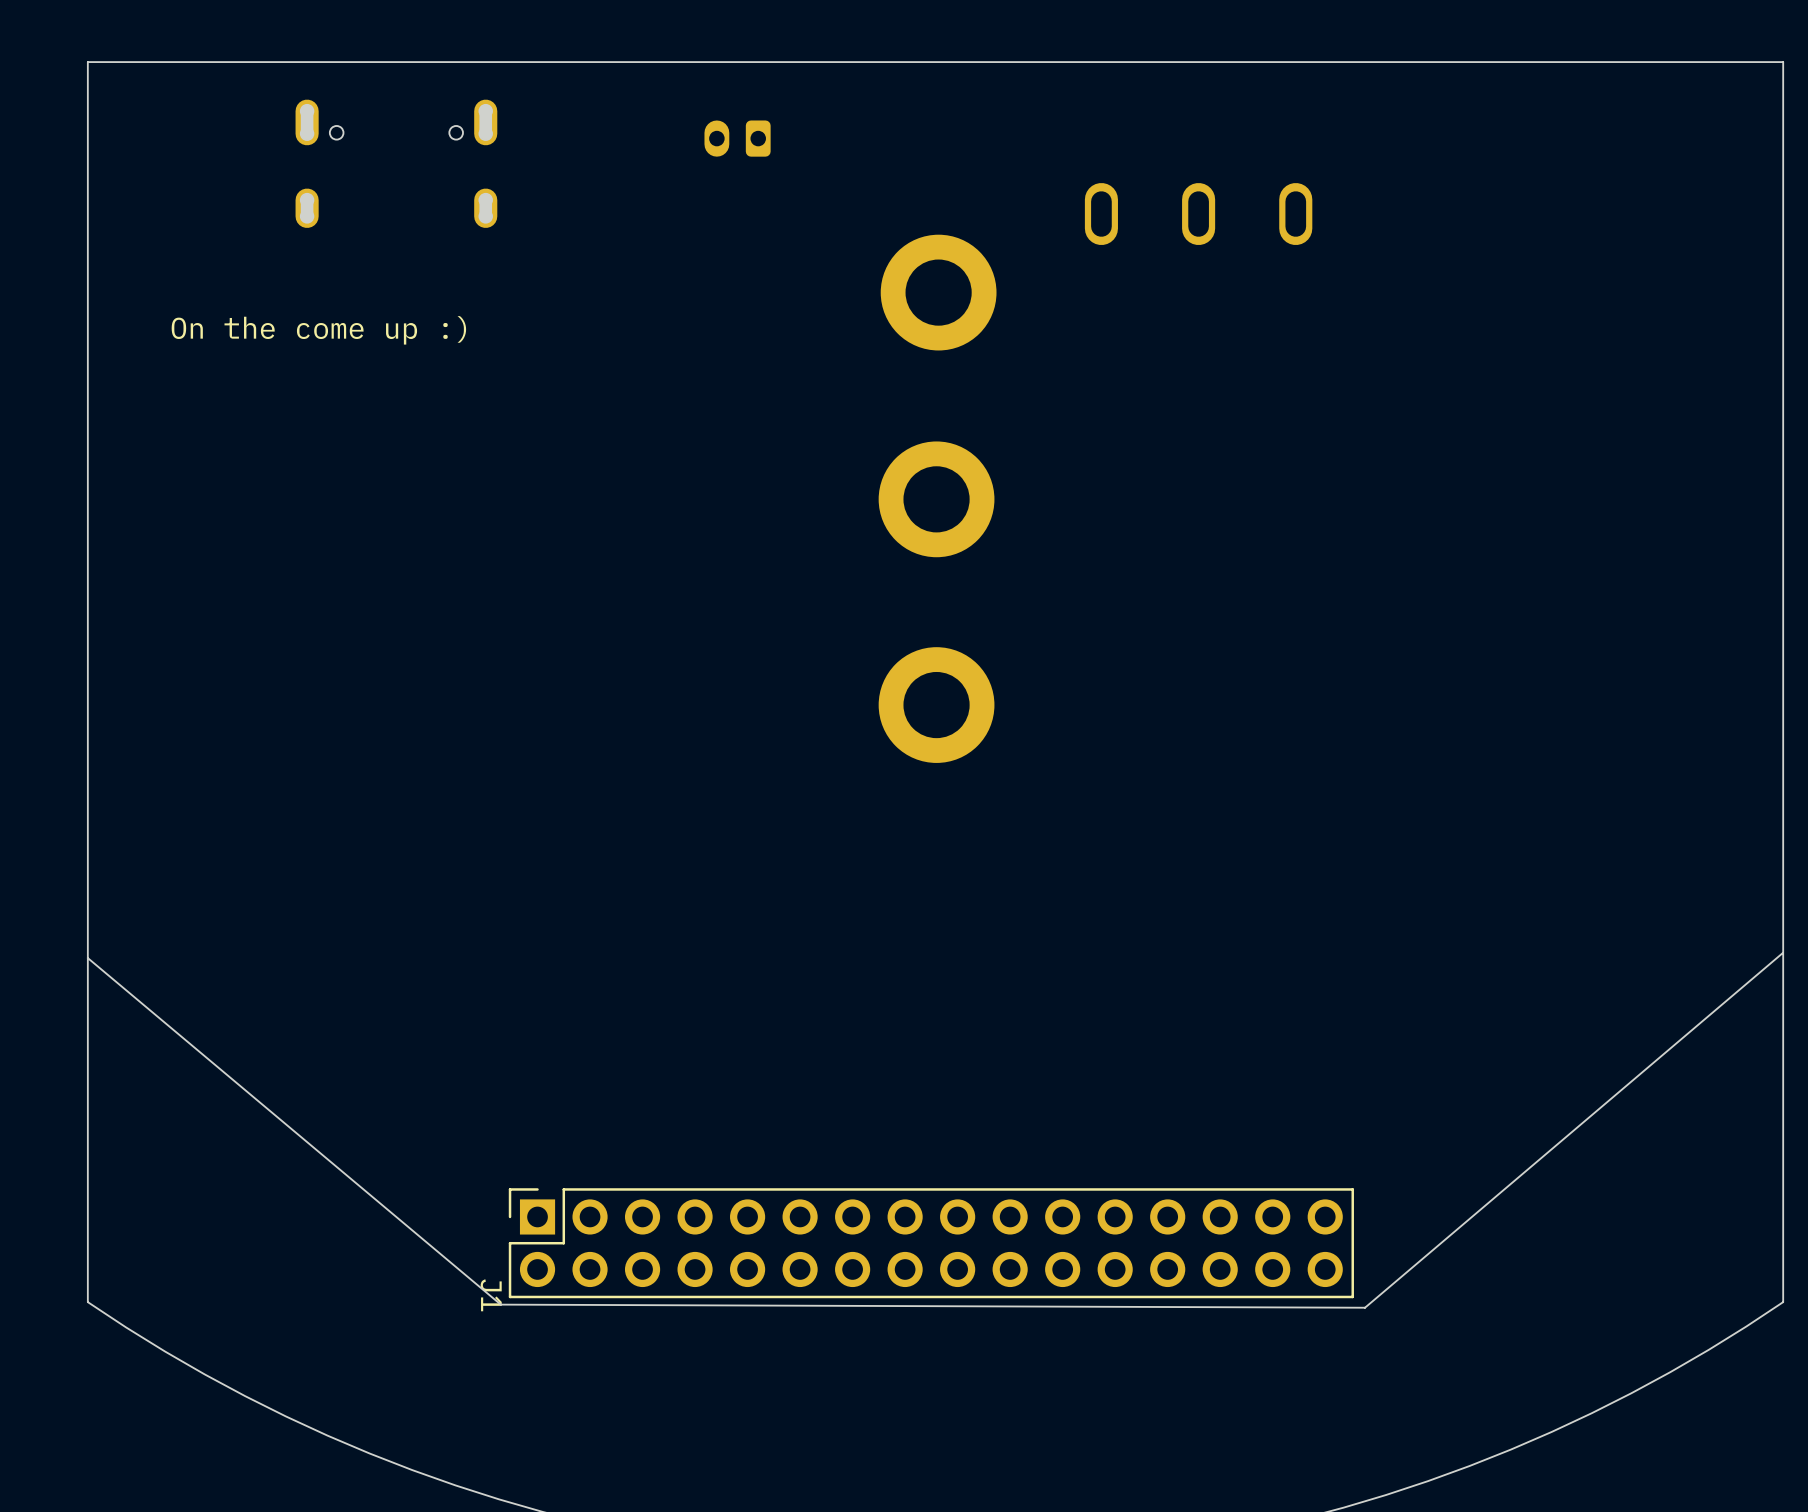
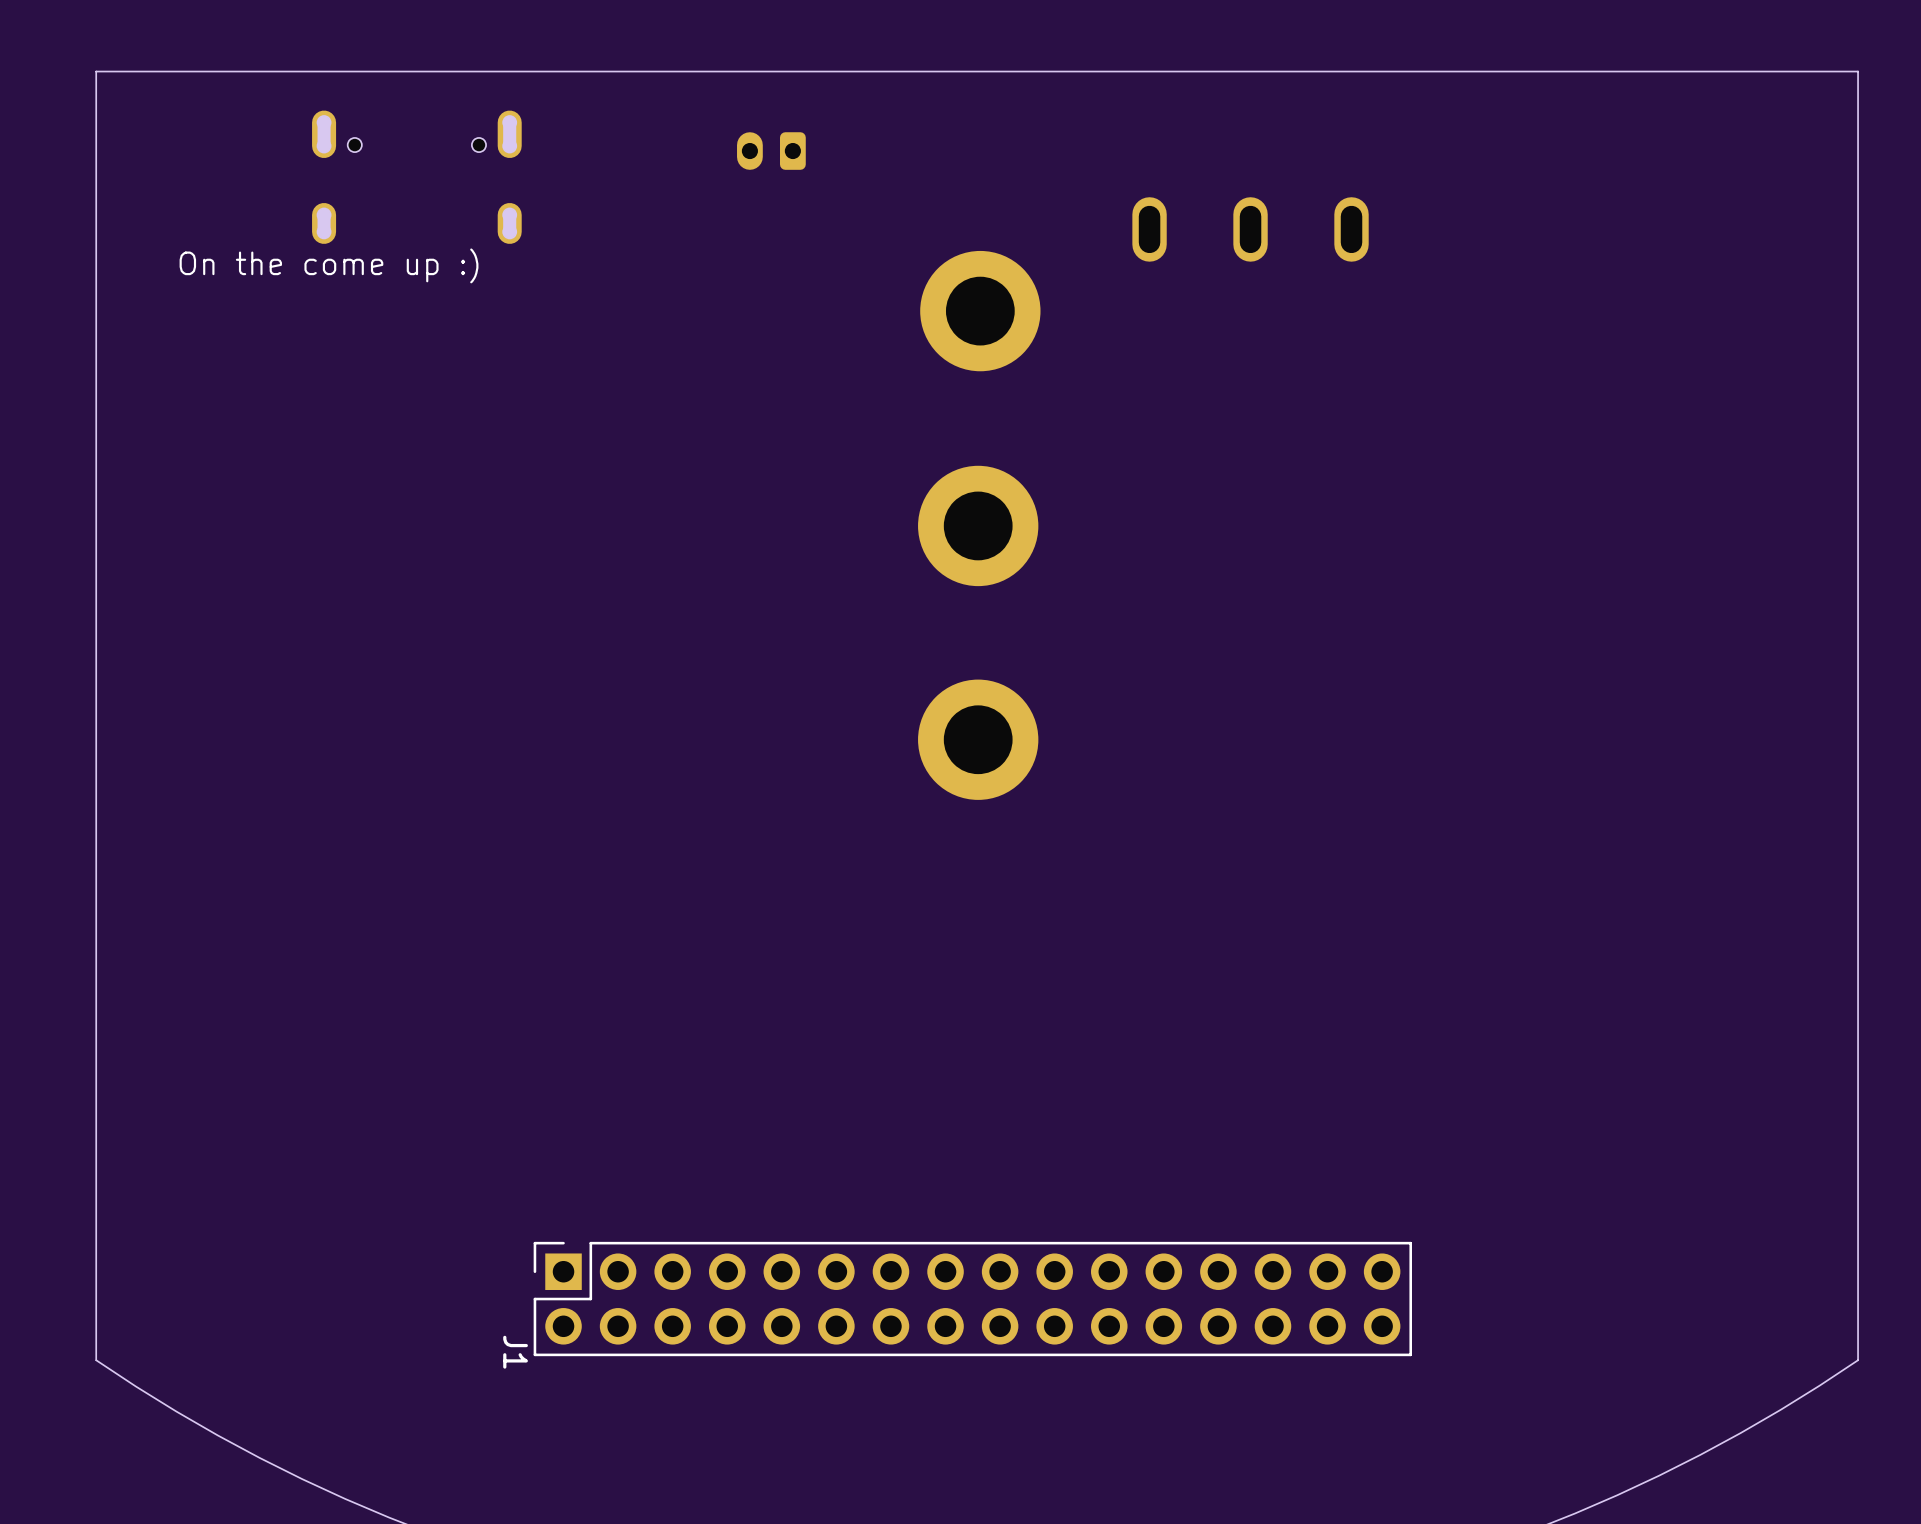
text position: On the come up :) (318, 330) -> On the come up :) (329, 265)
board edge: (1782, 953) (1365, 1307) (500, 1304) (87, 958) -> none

